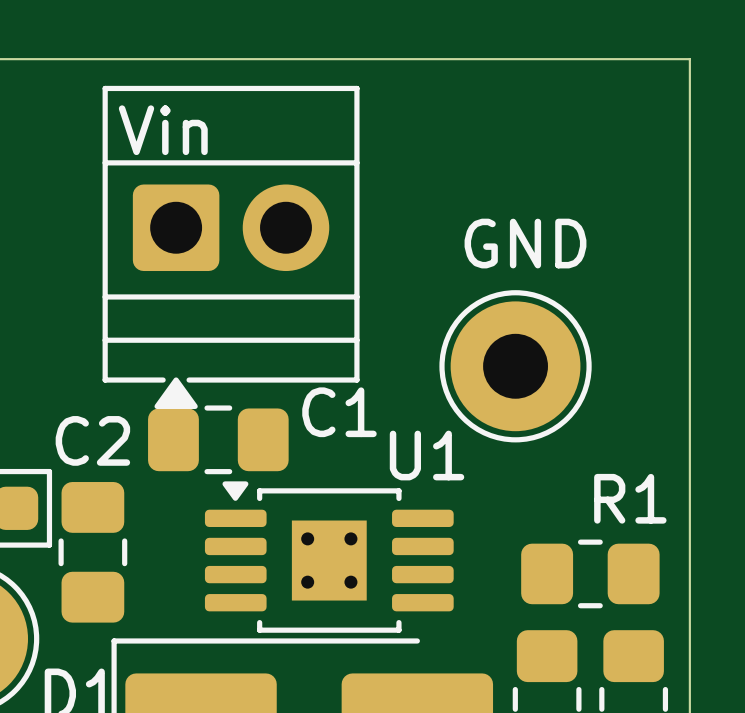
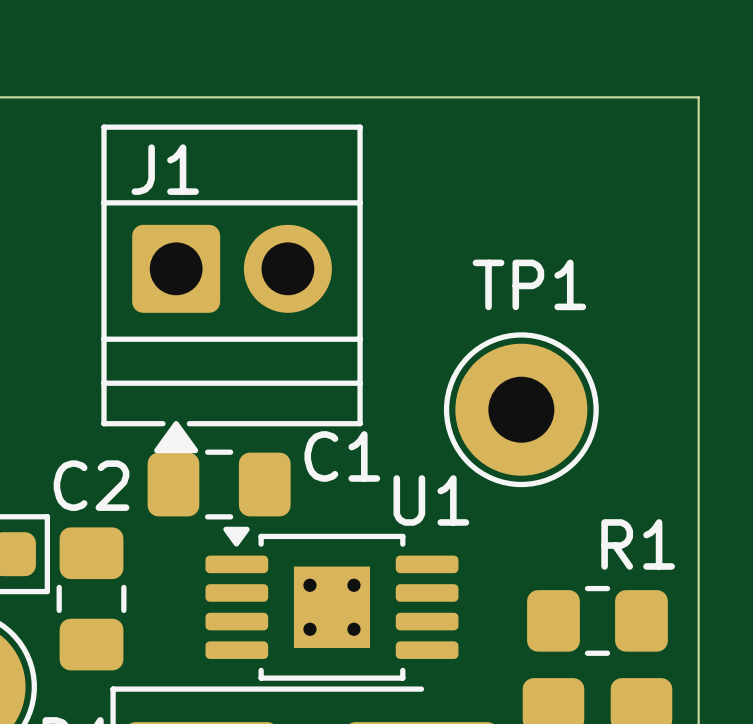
Vin name: Vin (163, 130) -> J1 (165, 169)
GND name: GND (525, 243) -> TP1 (529, 284)

